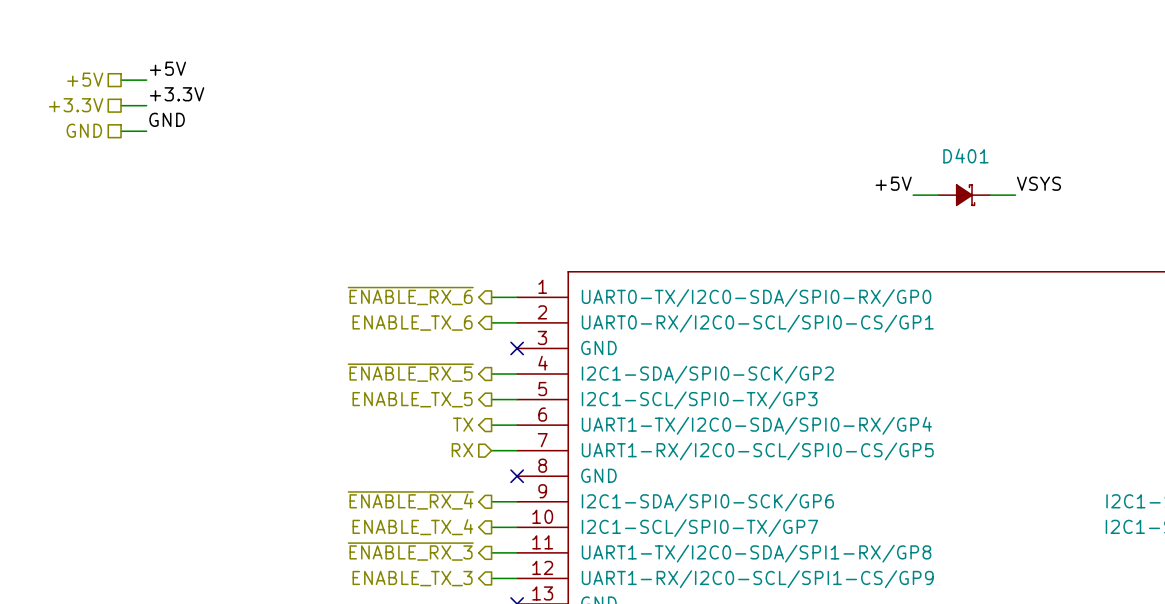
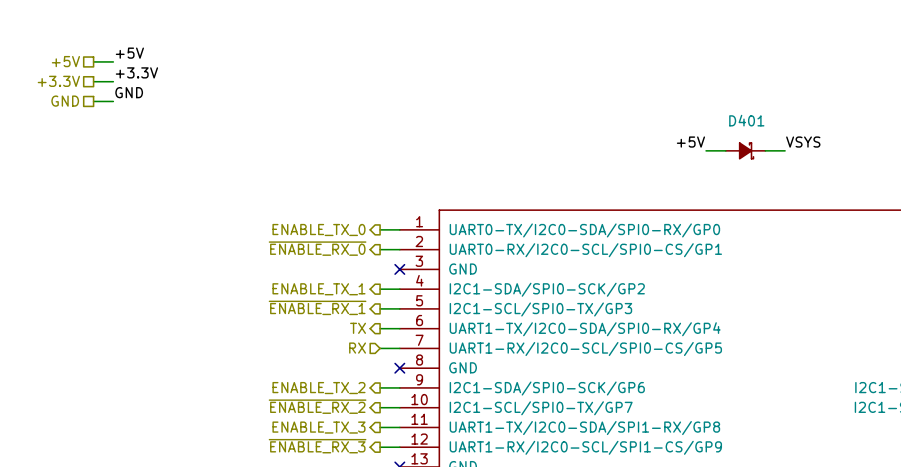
hierarchical label: ~{ENABLE_RX_6} (410, 296) -> ENABLE_TX_0 (318, 229)
hierarchical label: ENABLE_TX_6 (412, 323) -> ~{ENABLE_RX_0} (317, 248)
hierarchical label: ~{ENABLE_RX_5} (410, 372) -> ENABLE_TX_1 (318, 289)
hierarchical label: ENABLE_TX_5 (412, 399) -> ~{ENABLE_RX_1} (317, 307)
hierarchical label: ~{ENABLE_RX_4} (410, 500) -> ENABLE_TX_2 (318, 388)
hierarchical label: ENABLE_TX_4 (412, 527) -> ~{ENABLE_RX_2} (317, 406)
hierarchical label: ~{ENABLE_RX_3} (410, 551) -> ENABLE_TX_3 (318, 427)
hierarchical label: ENABLE_TX_3 (412, 578) -> ~{ENABLE_RX_3} (317, 446)

